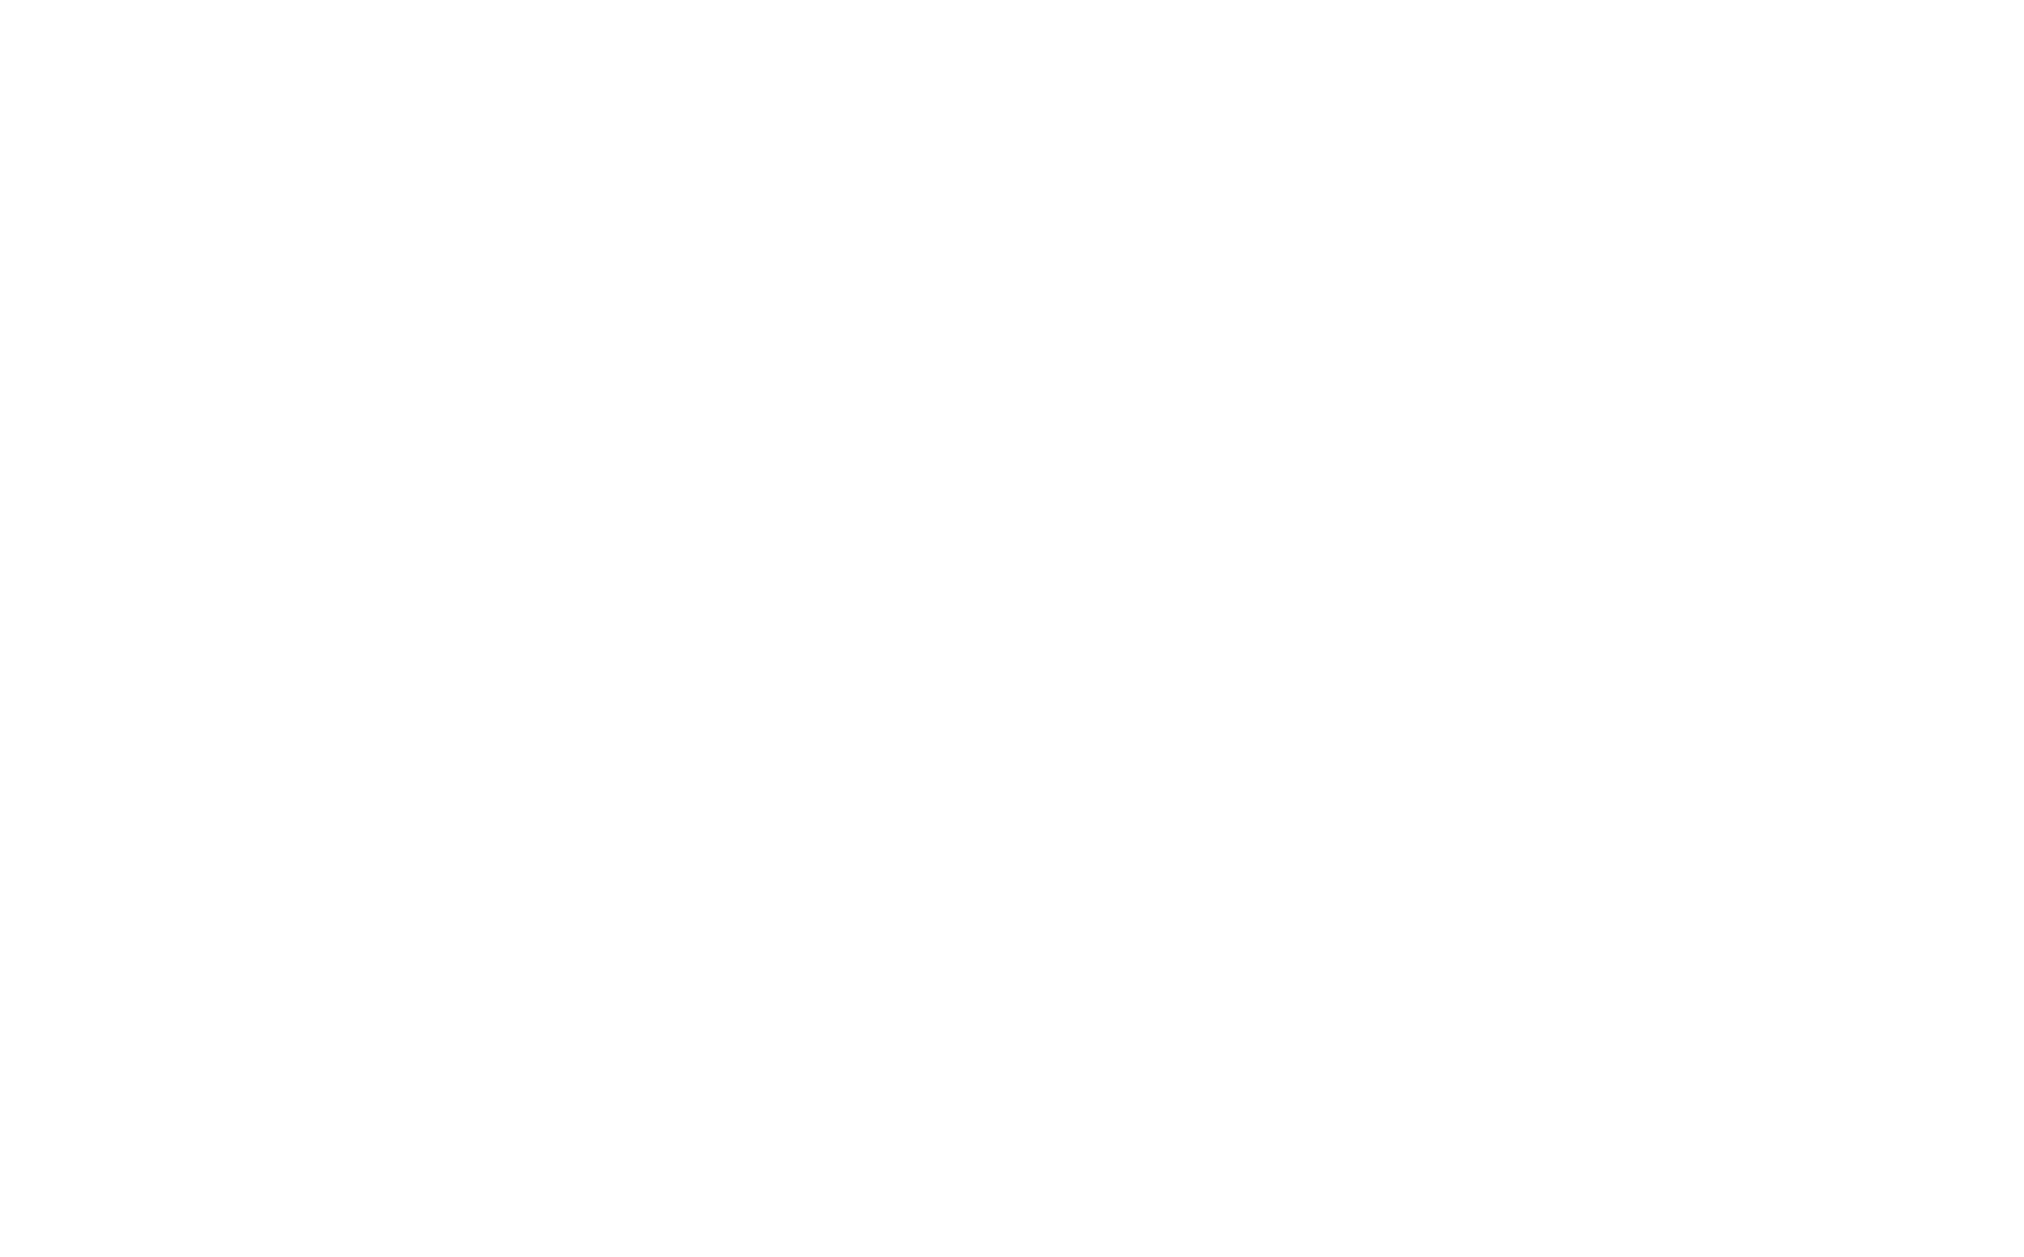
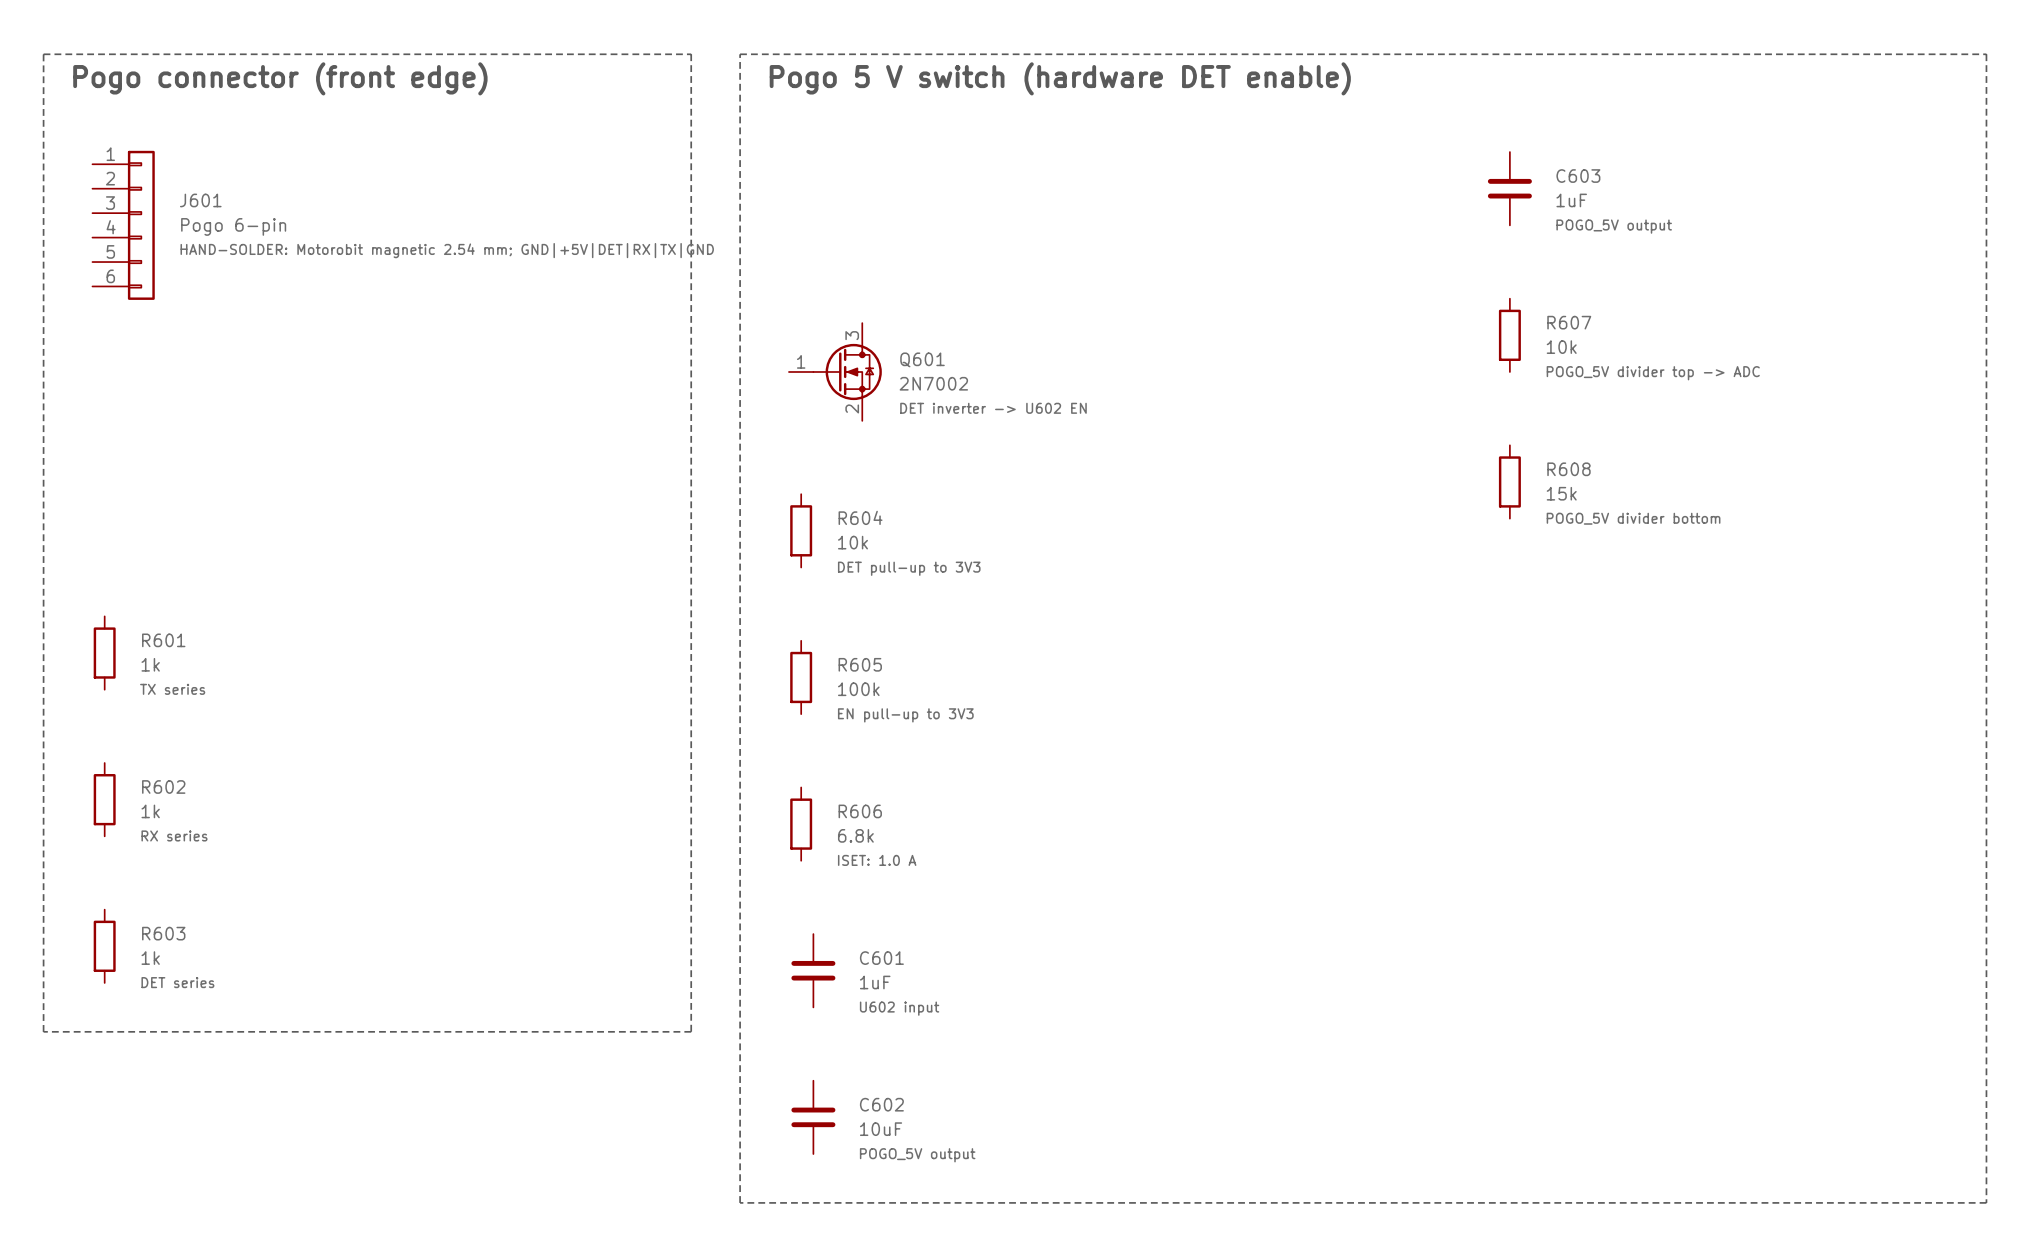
line: none -> (43, 54) (691, 54) (691, 1031) (43, 1031) (43, 54)
line: none -> (740, 54) (1986, 54) (1986, 1202) (740, 1202) (740, 54)
text: none -> Pogo connector (front edge) (280, 78)
text: none -> Pogo 5 V switch (hardware DET enable) (1060, 78)
C603: none -> 1uF (1509, 188)
J601: none -> Pogo 6-pin (123, 225)
R607: none -> 10k (1509, 335)
Q601: none -> 2N7002 (835, 371)
R608: none -> 15k (1509, 481)
R604: none -> 10k (801, 530)
R601: none -> 1k (104, 653)
R605: none -> 100k (801, 677)
R602: none -> 1k (104, 799)
R606: none -> 6.8k (801, 824)
R603: none -> 1k (104, 946)
C601: none -> 1uF (813, 970)
C602: none -> 10uF (813, 1117)

